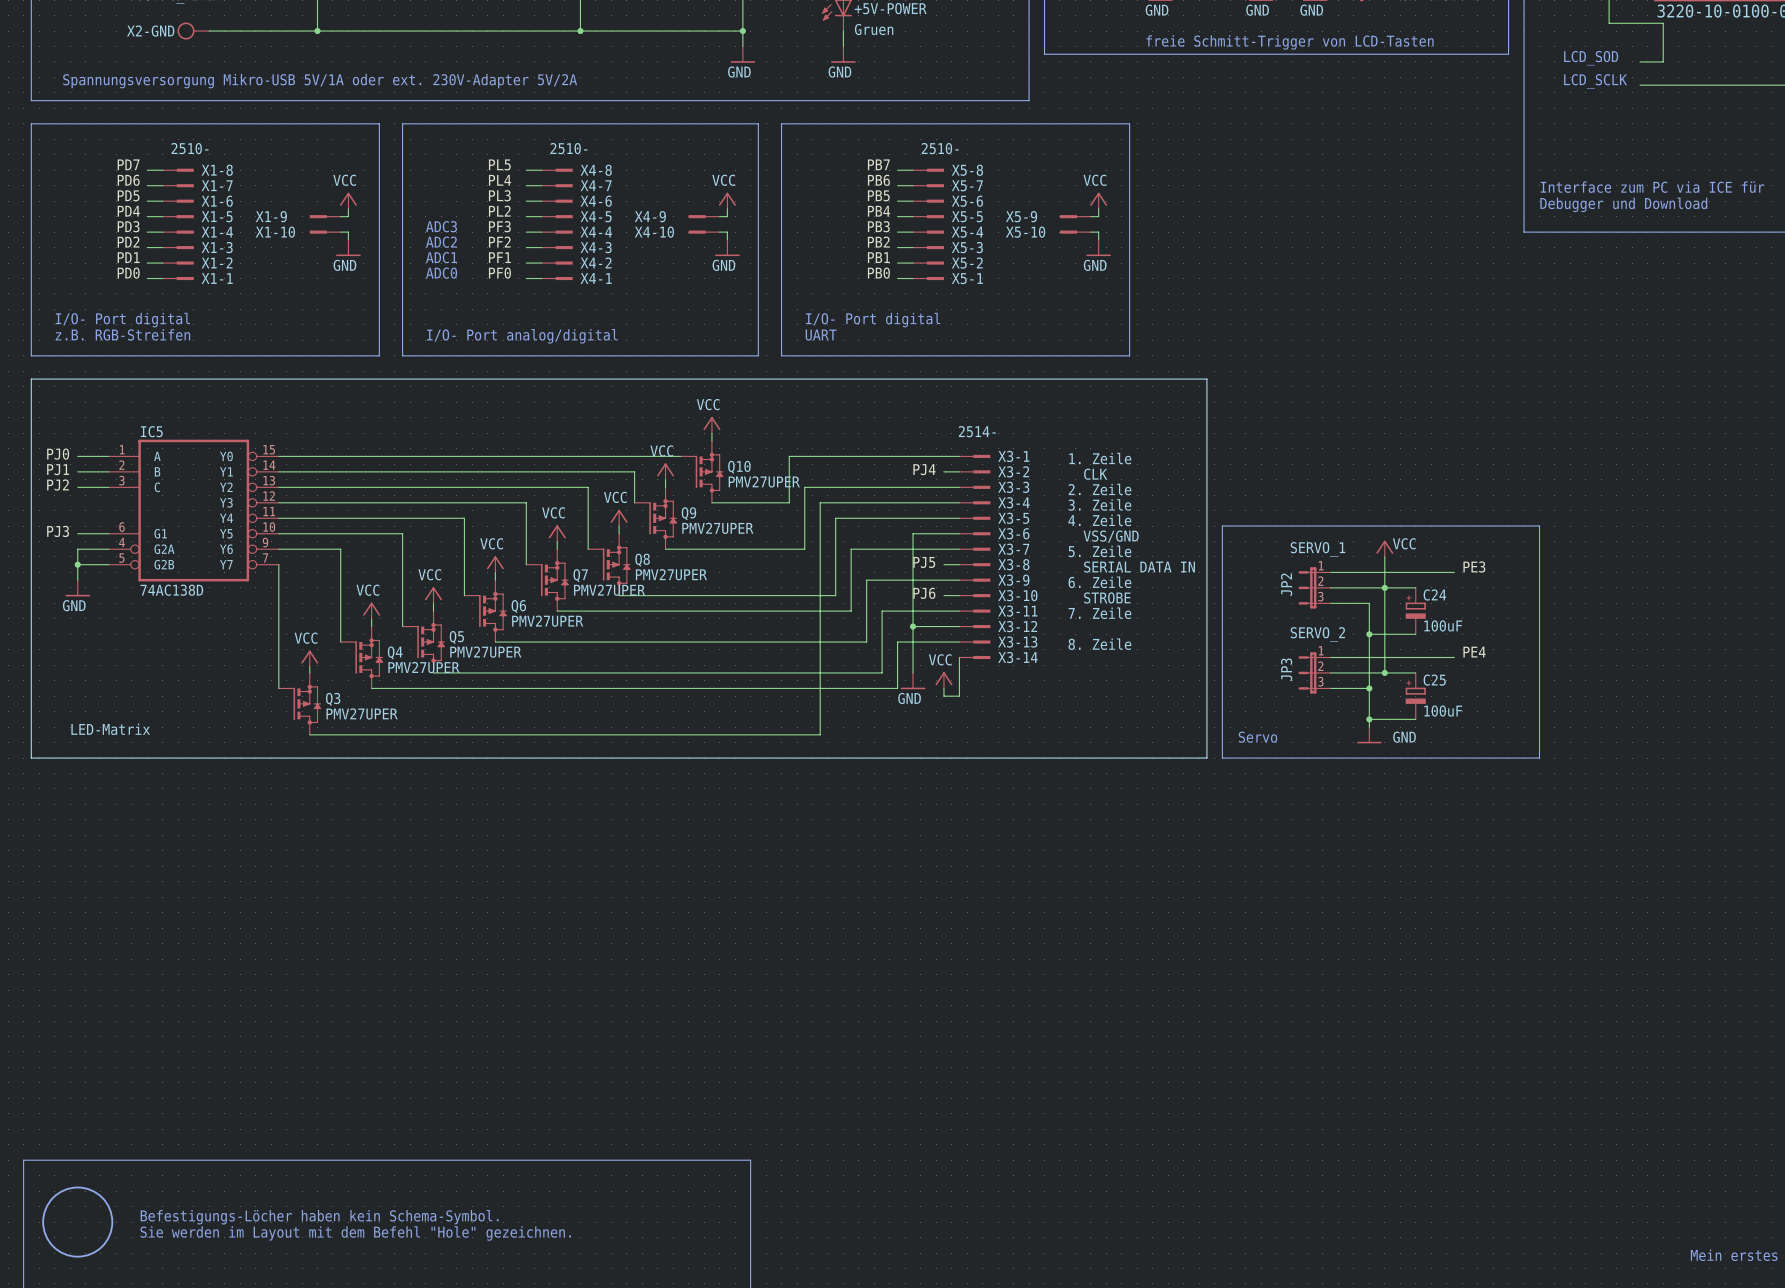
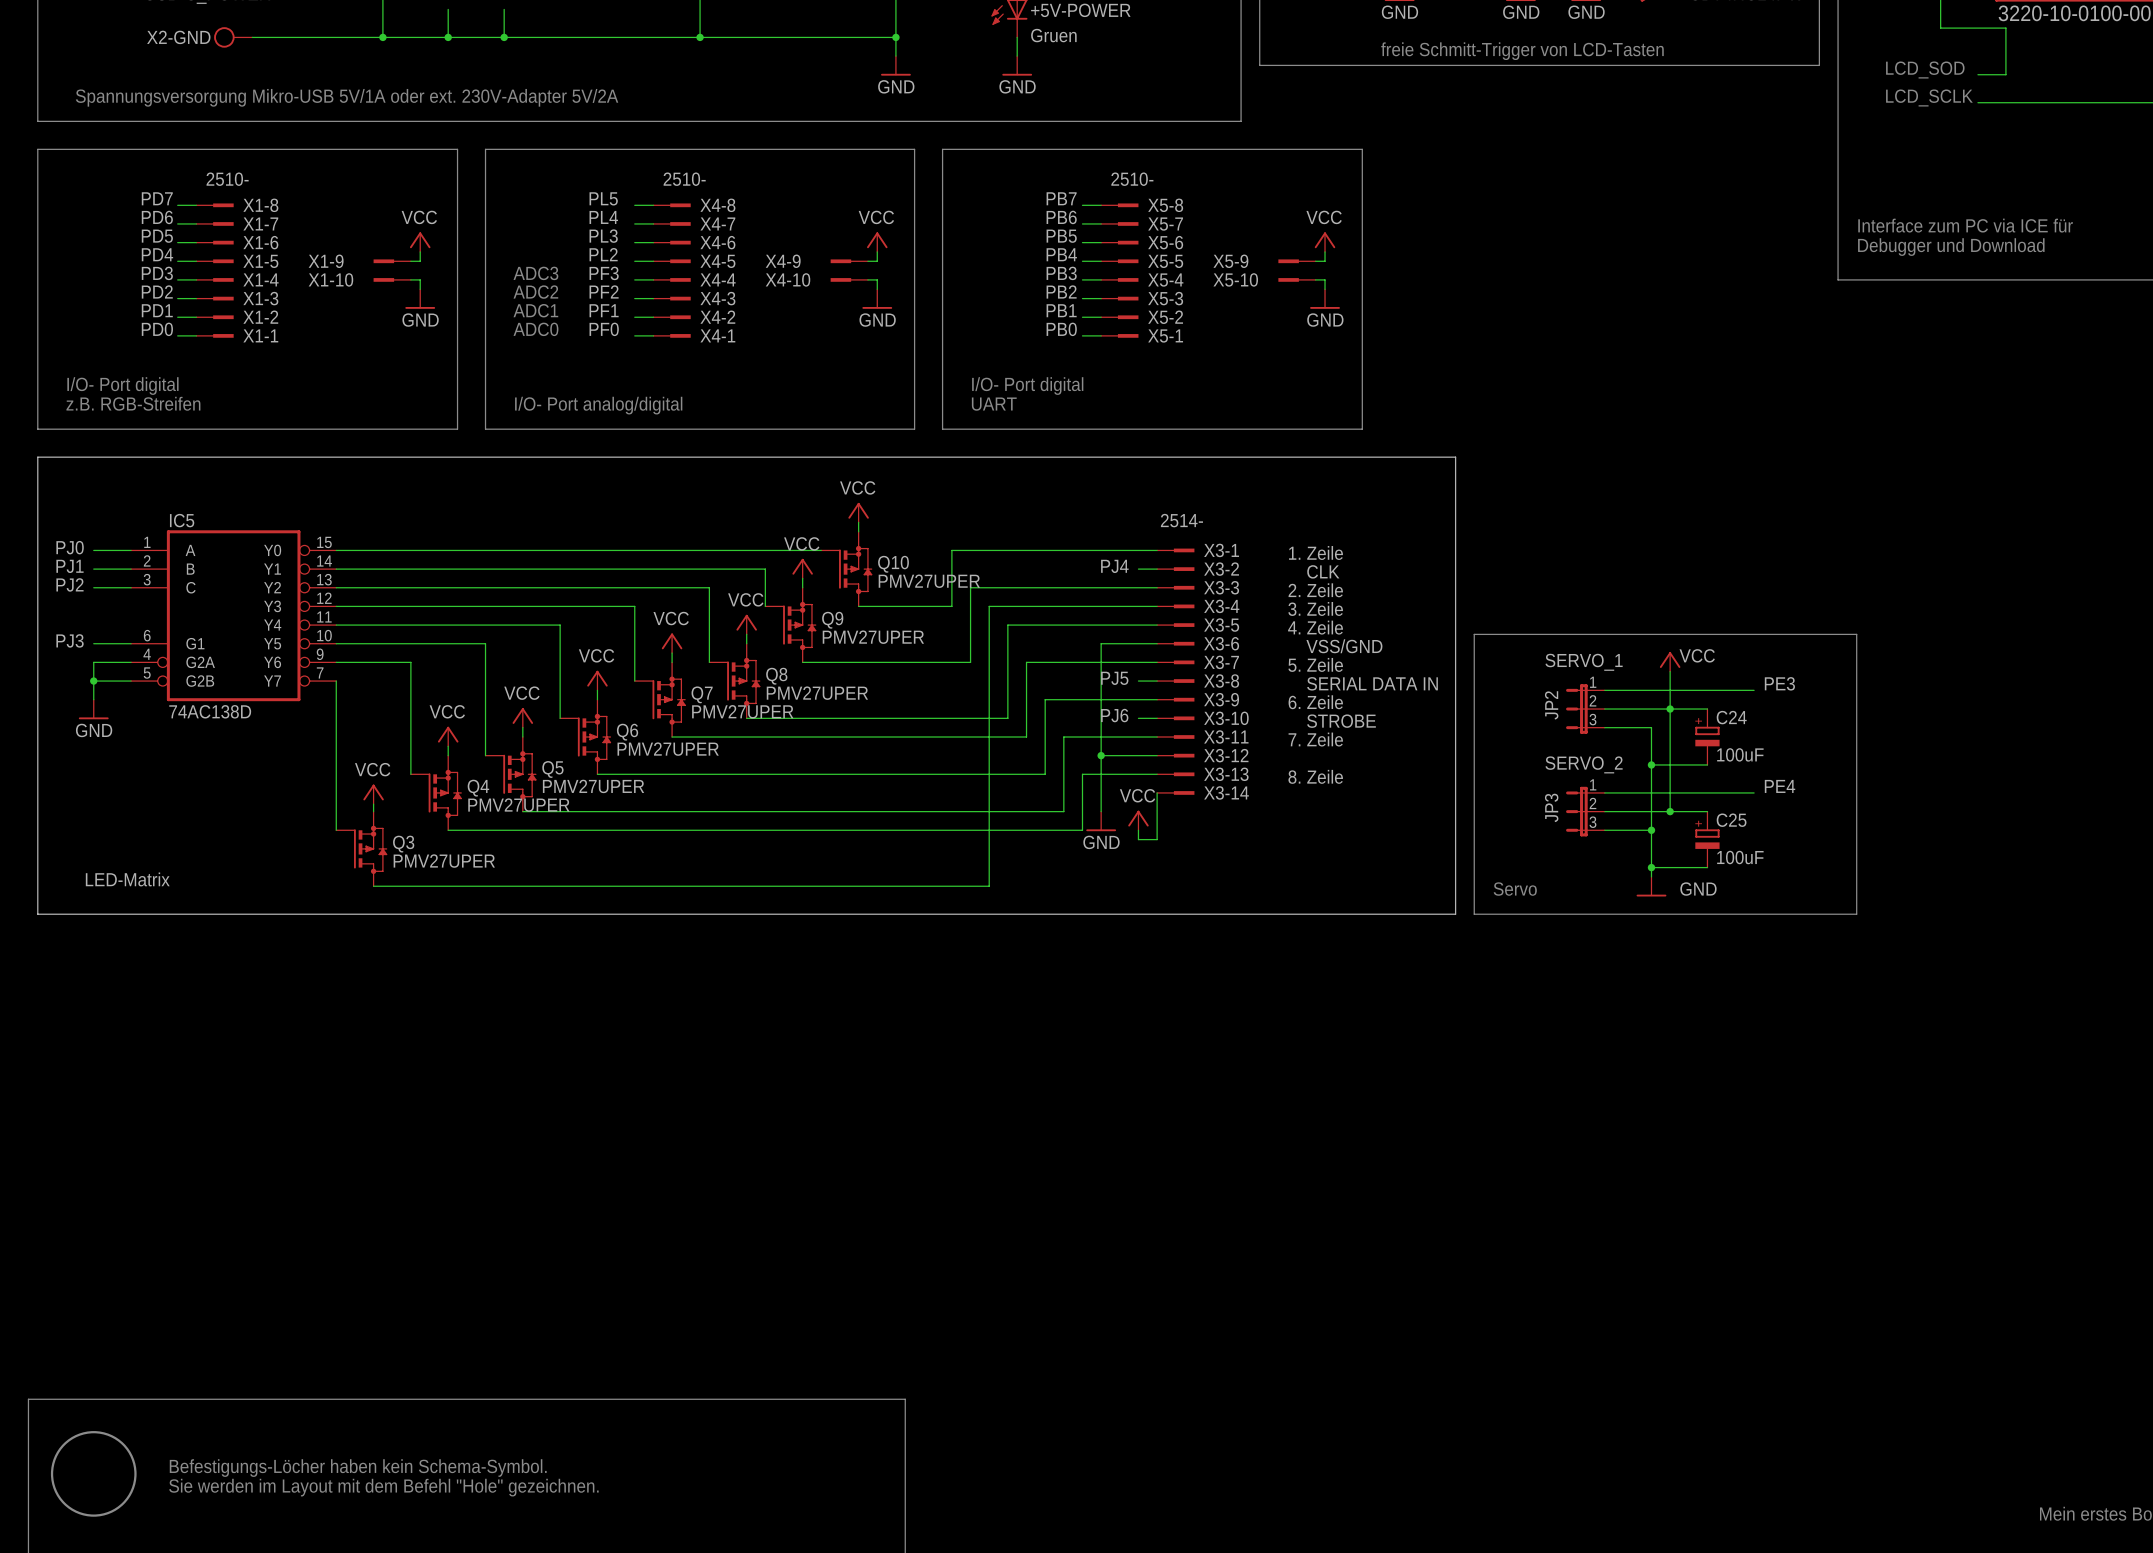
wire: none -> (448, 9) (448, 37)
wire: none -> (504, 9) (504, 37)
junction: none -> (448, 37)
junction: none -> (504, 37)

